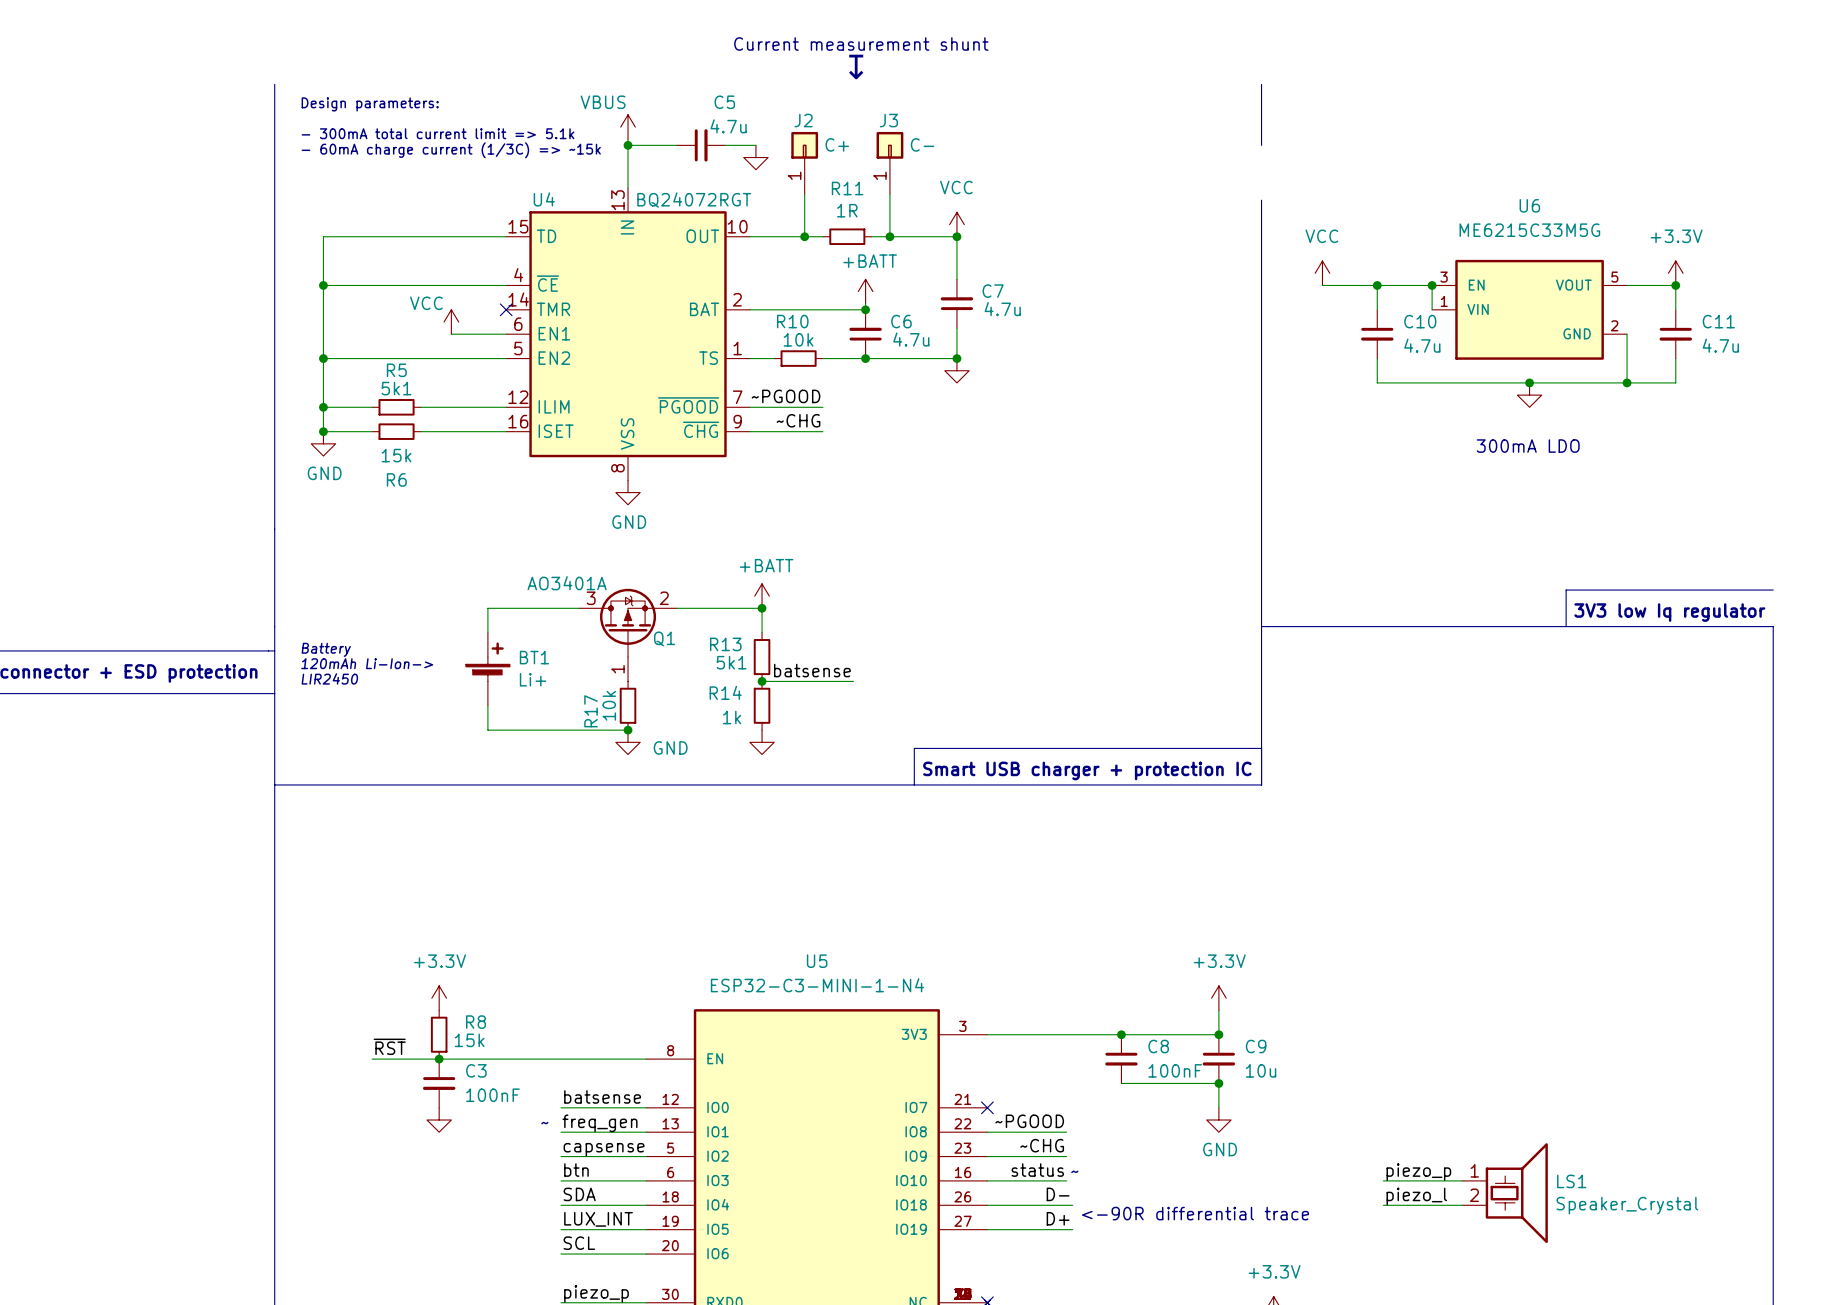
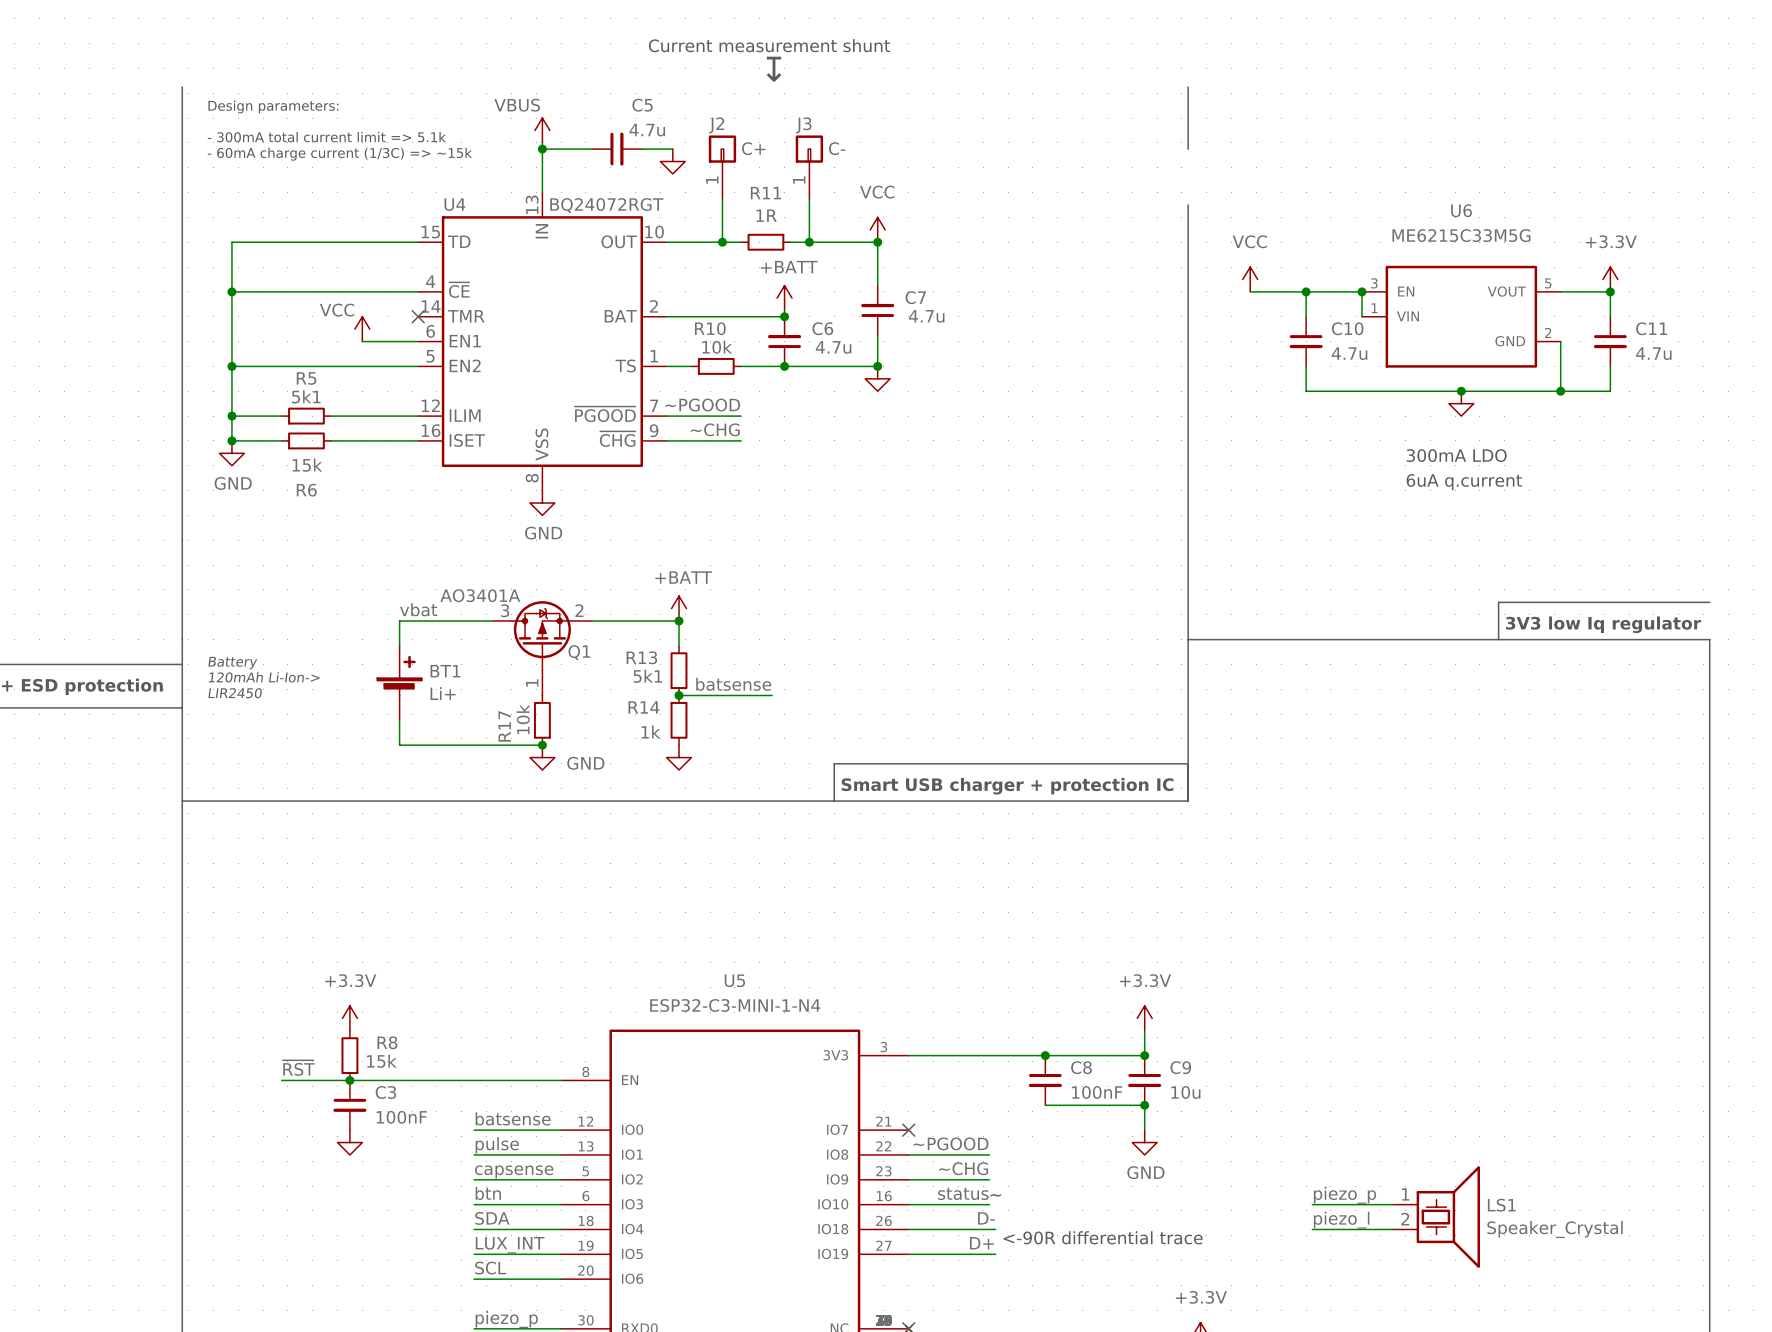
text: none -> 6uA q.current (1464, 482)
label: none -> vbat (418, 609)
text: ~ (544, 1123) -> none
label: freq_gen (599, 1123) -> pulse (497, 1145)

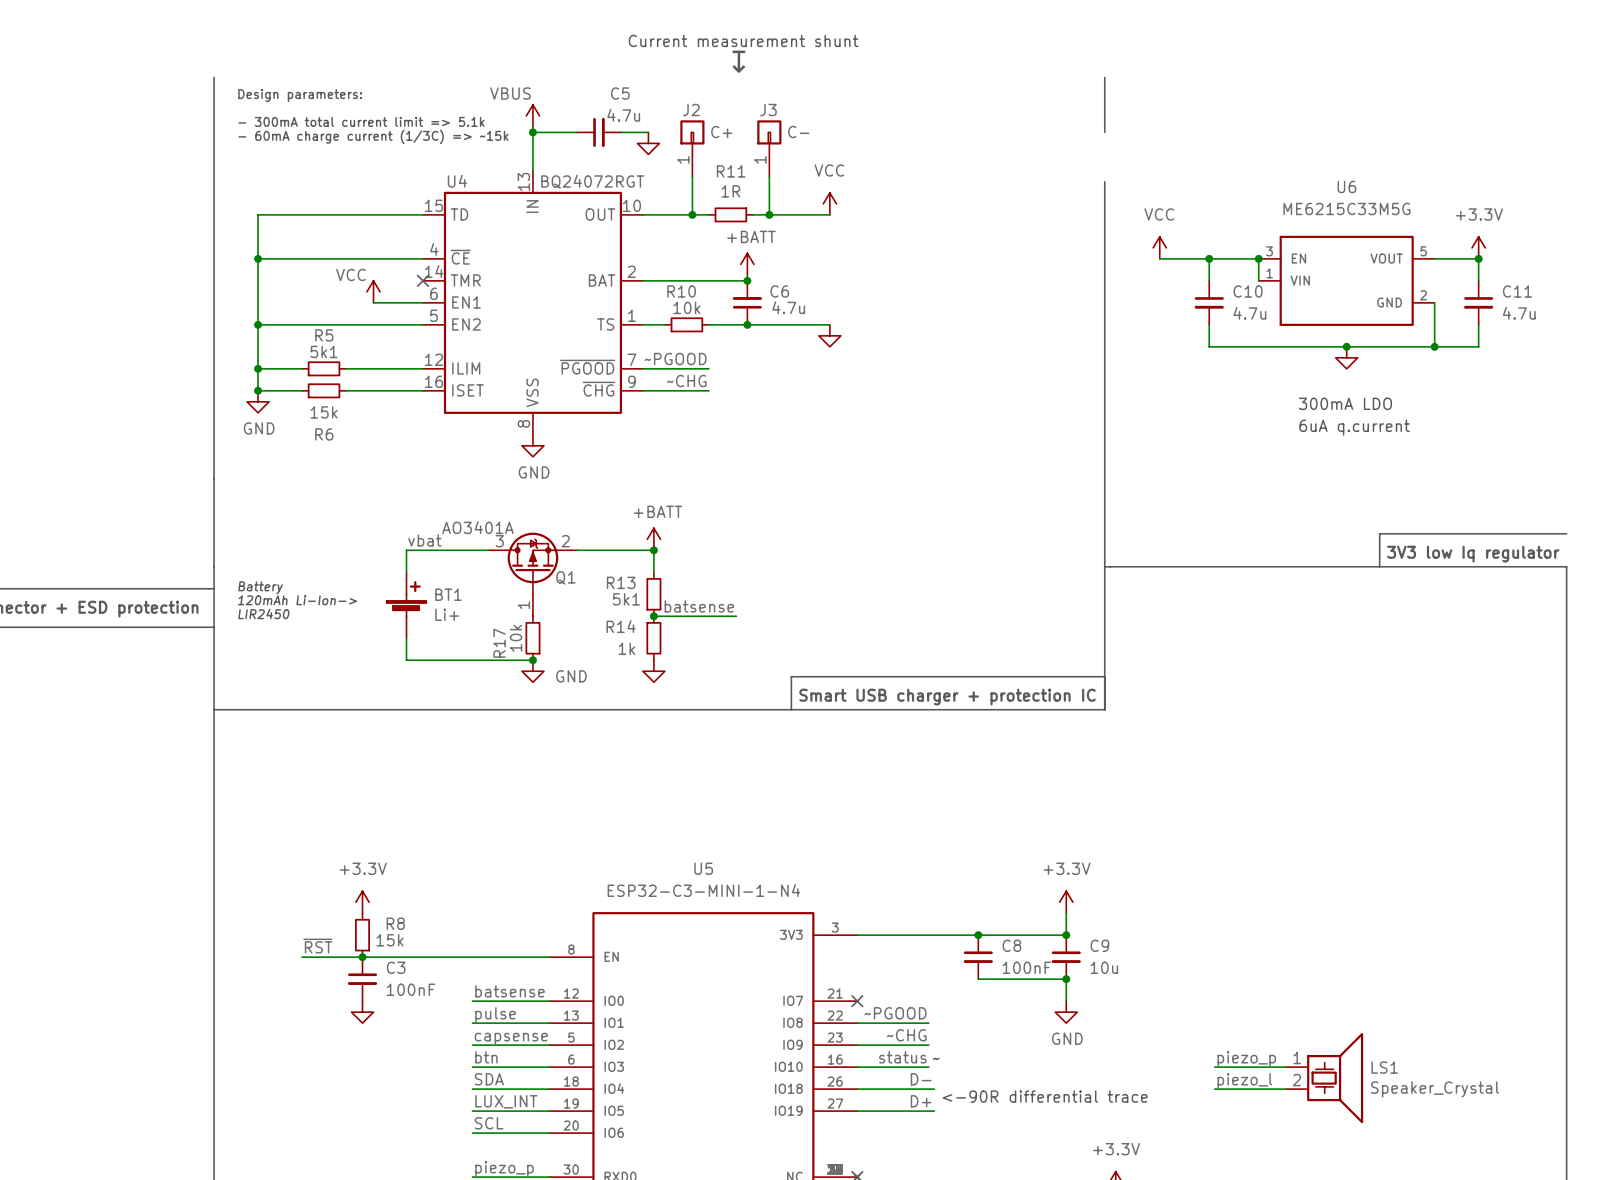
wire: (877, 242) (877, 285) -> none
junction: (877, 242) -> none
C7: 4.7u (877, 310) -> none
wire: (877, 335) (877, 366) -> none
junction: (877, 366) -> none

